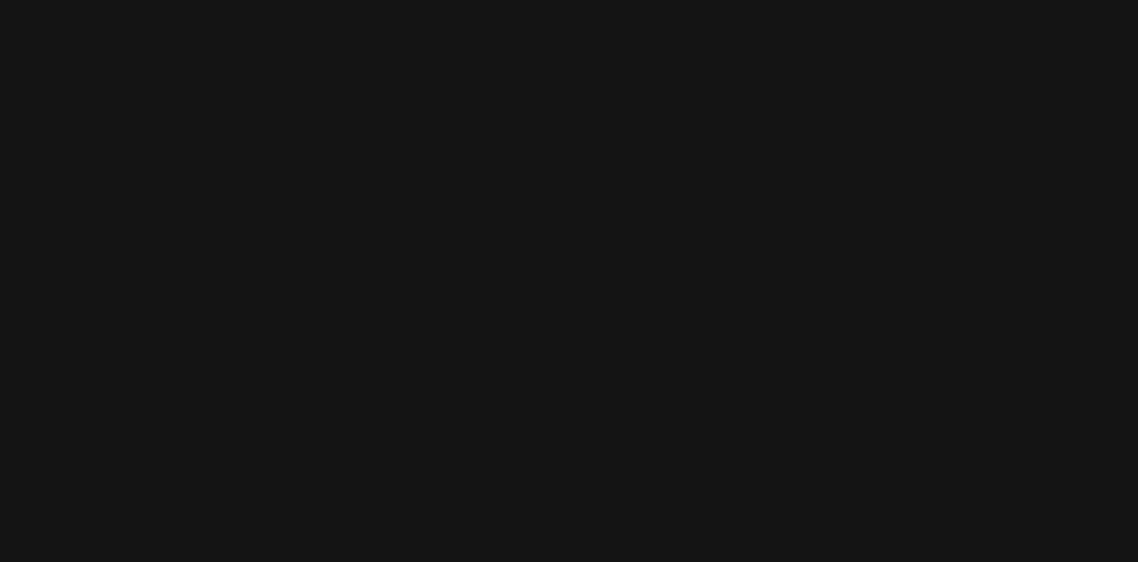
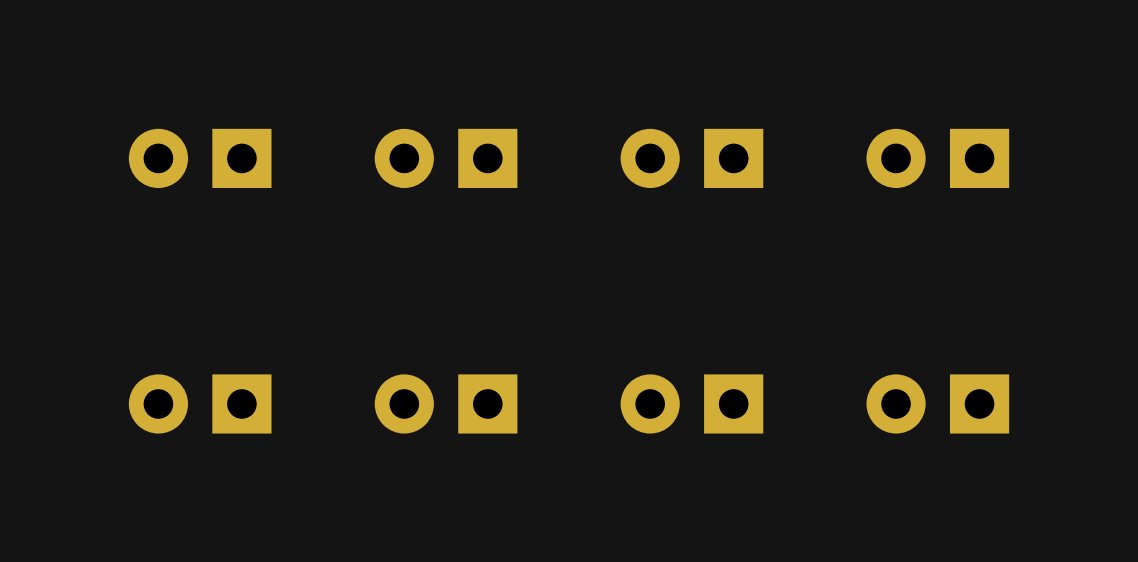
part: none -> (200, 158)
part: none -> (446, 158)
part: none -> (691, 158)
part: none -> (937, 158)
part: none -> (200, 403)
part: none -> (446, 403)
part: none -> (691, 403)
part: none -> (937, 403)

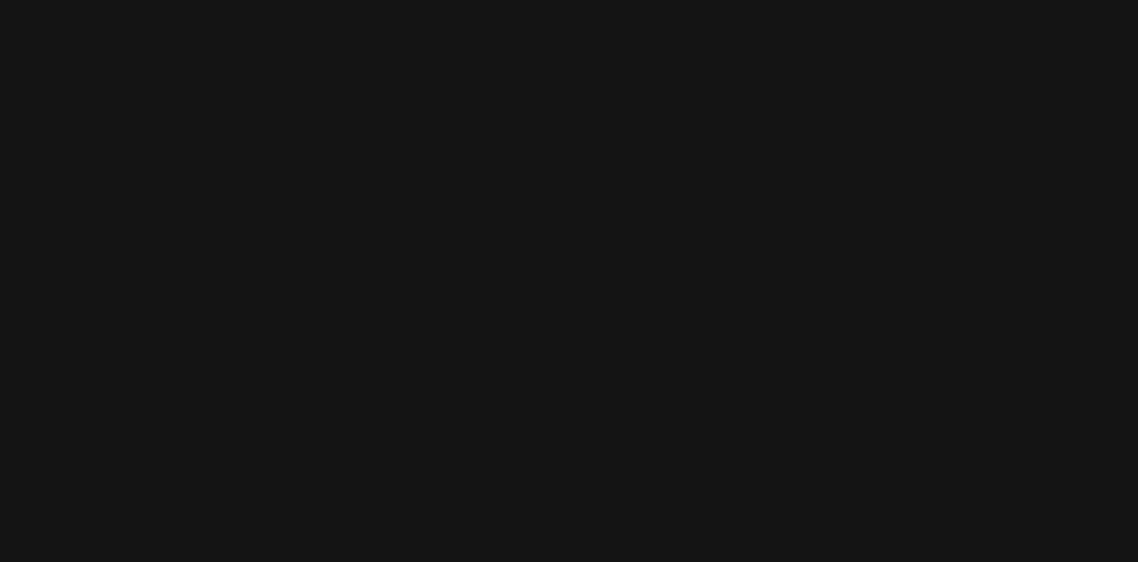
part: (200, 158) -> none
part: (446, 158) -> none
part: (691, 158) -> none
part: (937, 158) -> none
part: (200, 403) -> none
part: (446, 403) -> none
part: (691, 403) -> none
part: (937, 403) -> none

